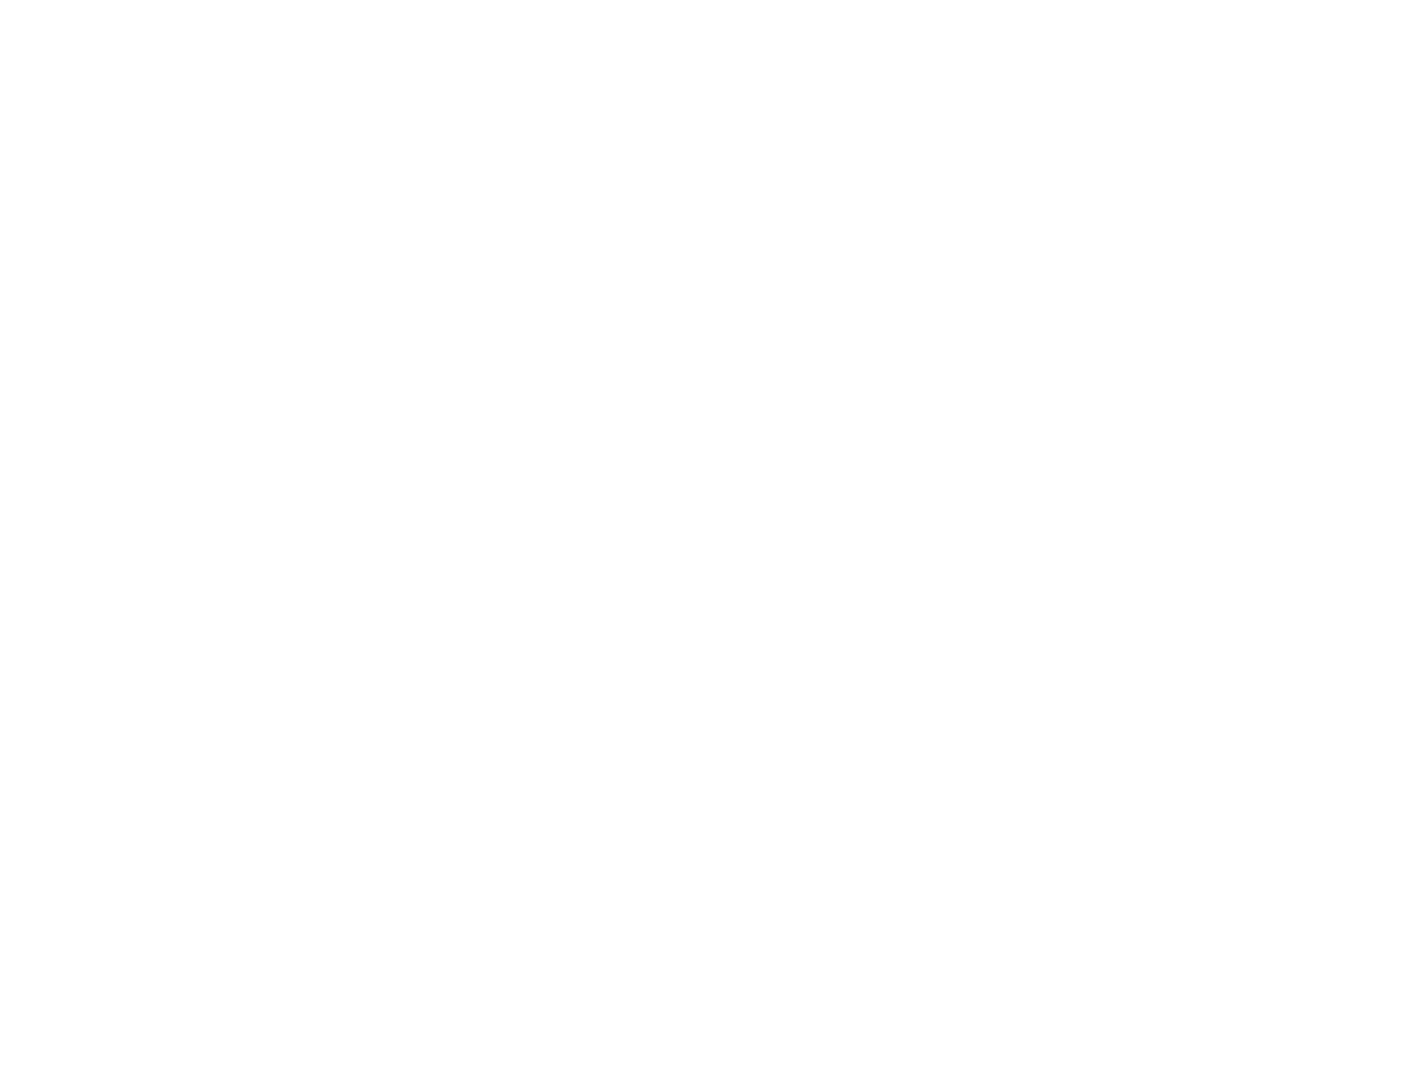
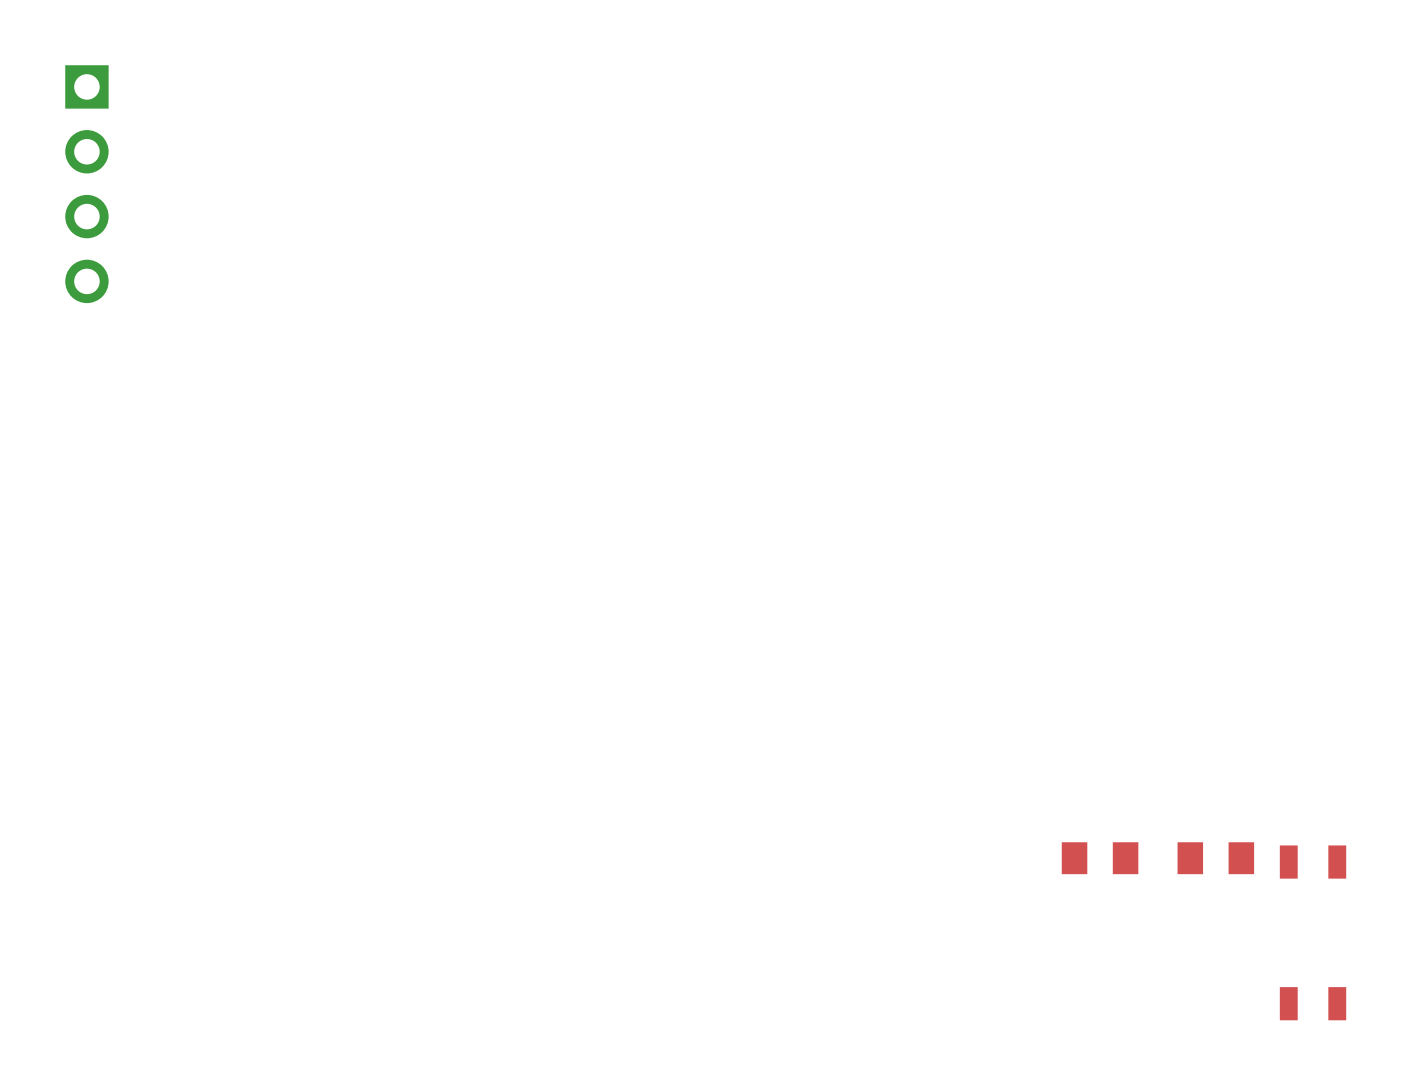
part: none -> (86, 184)
part: none -> (1100, 858)
part: none -> (1215, 858)
part: none -> (1313, 862)
part: none -> (1313, 1003)

